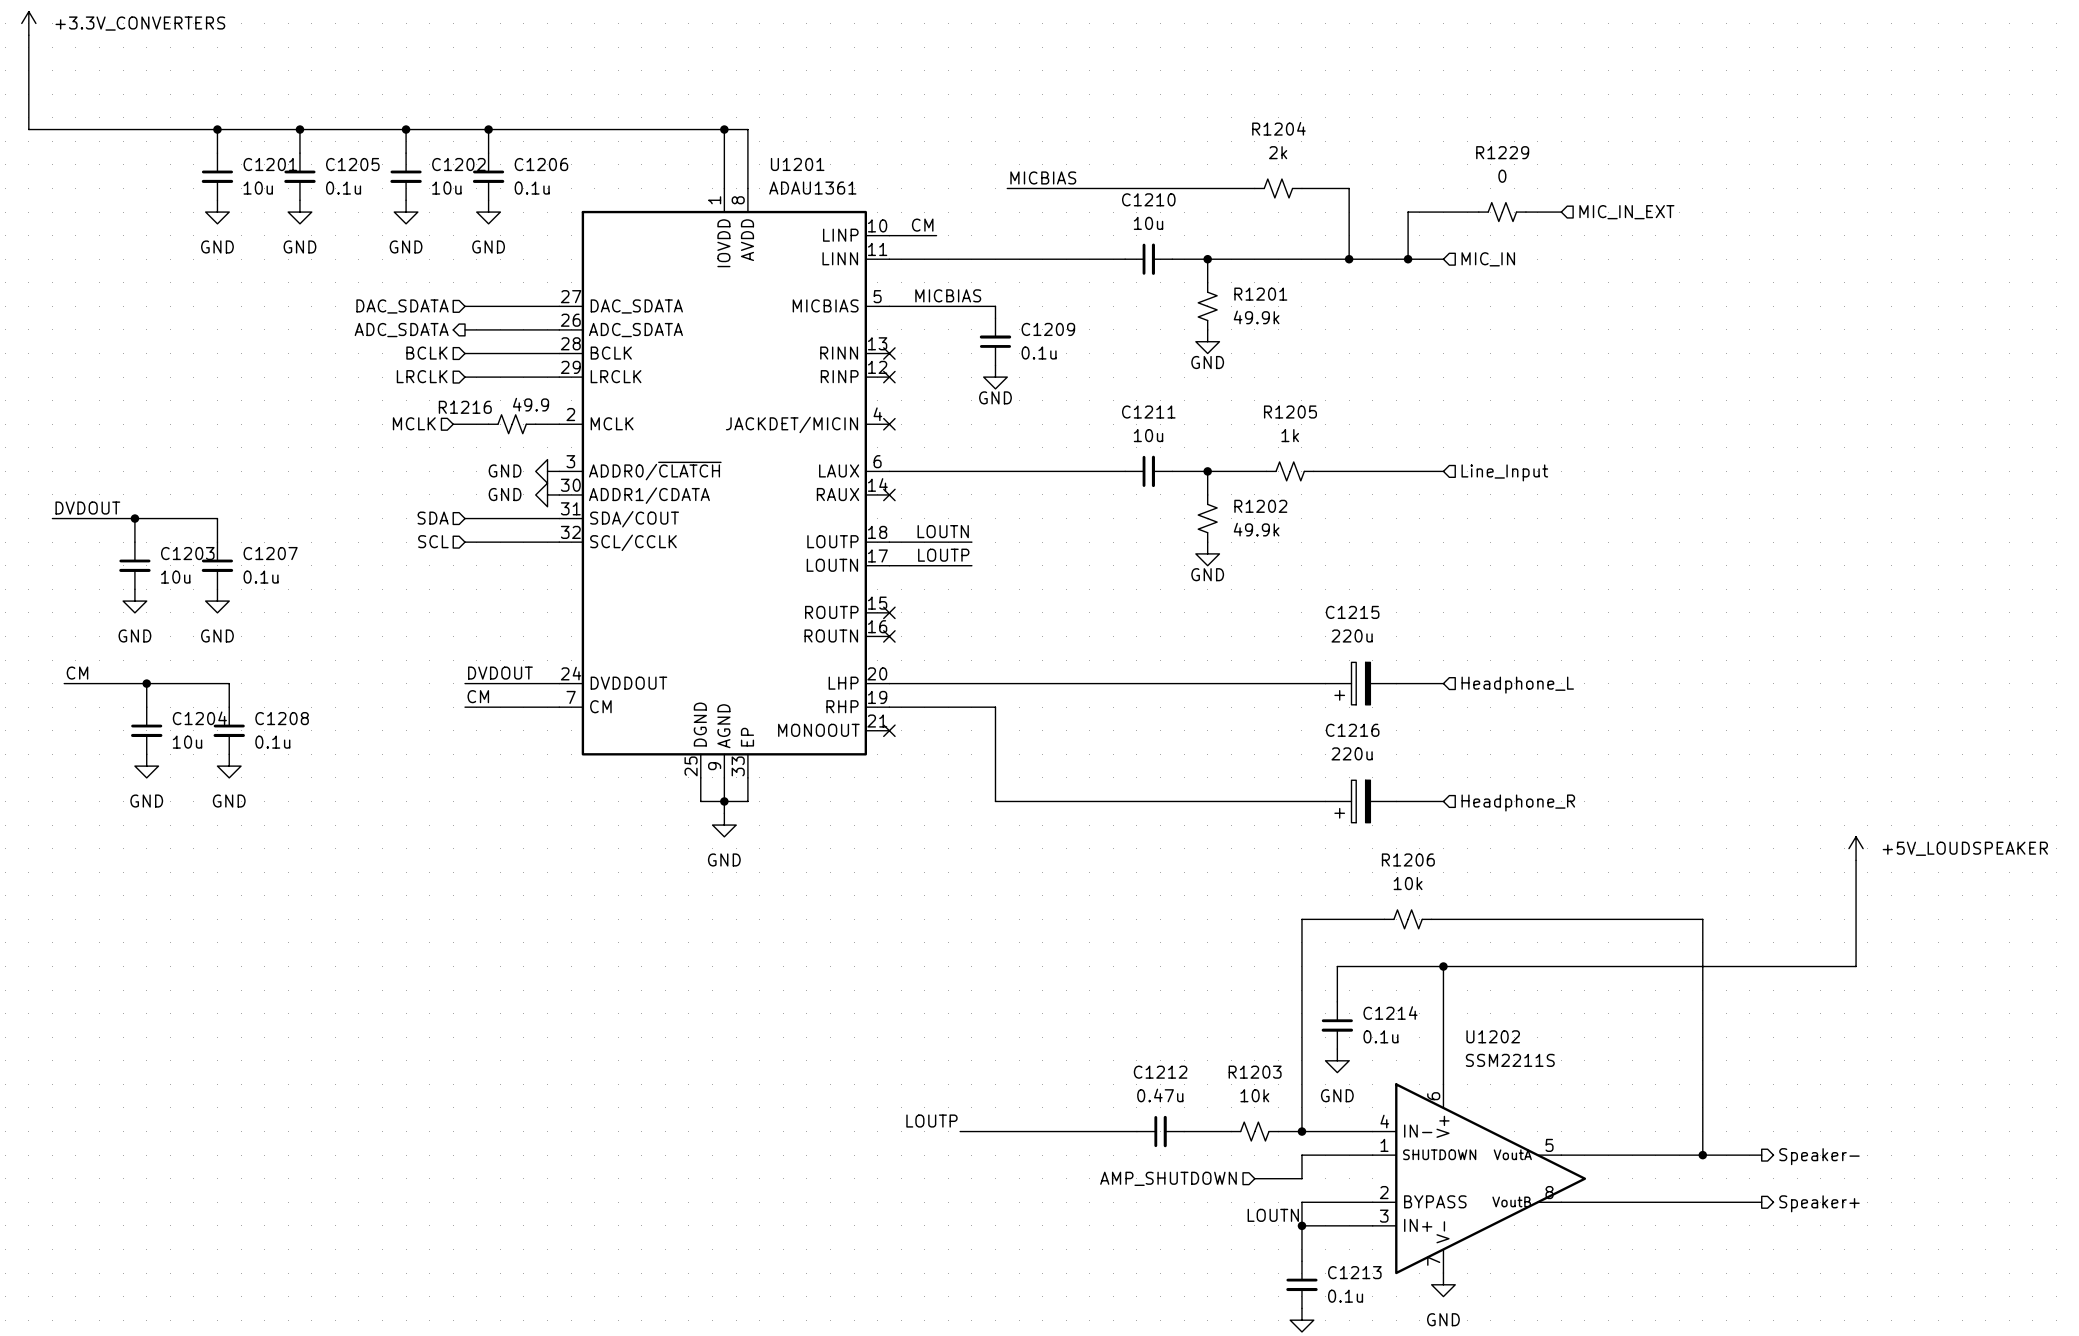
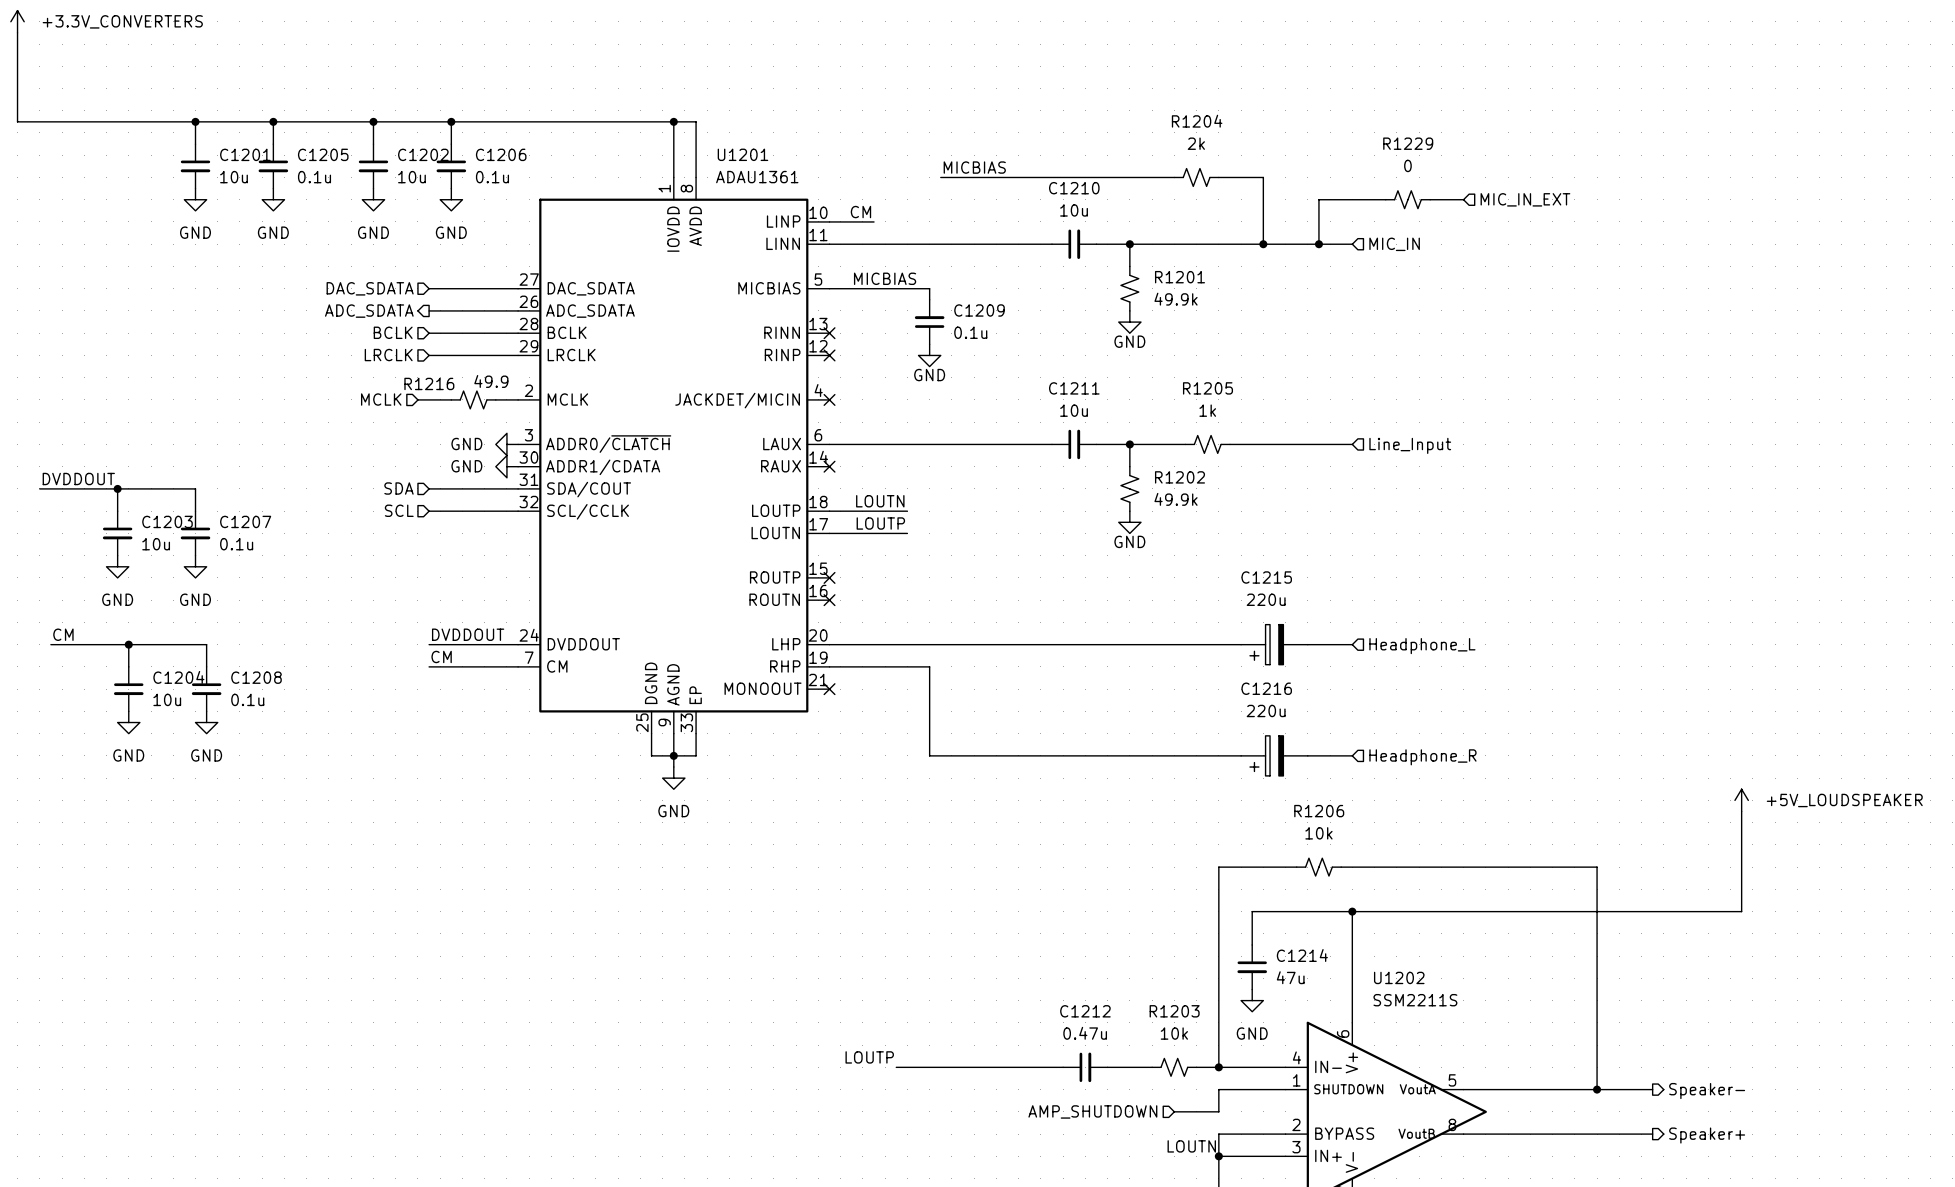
label: DVDOUT (87, 508) -> DVDDOUT (78, 479)
label: DVDOUT (500, 673) -> DVDDOUT (468, 634)
C1214 value: 0.1u (1380, 1036) -> 47u (1290, 977)

